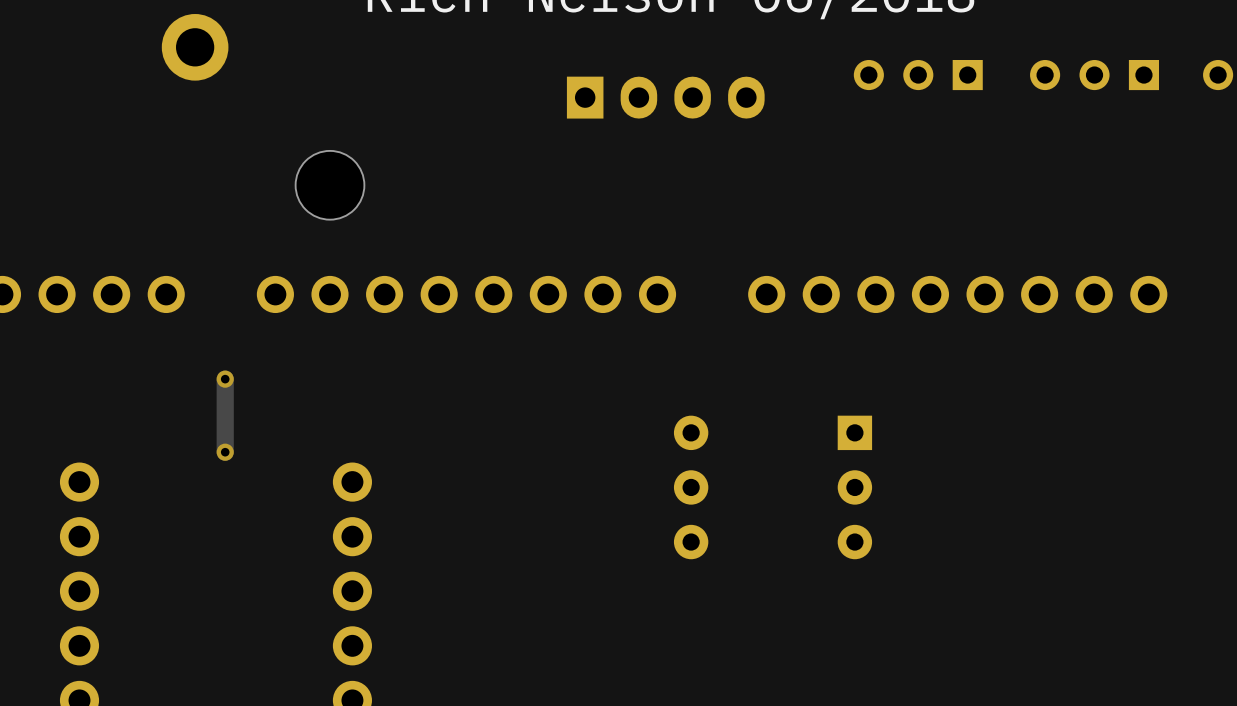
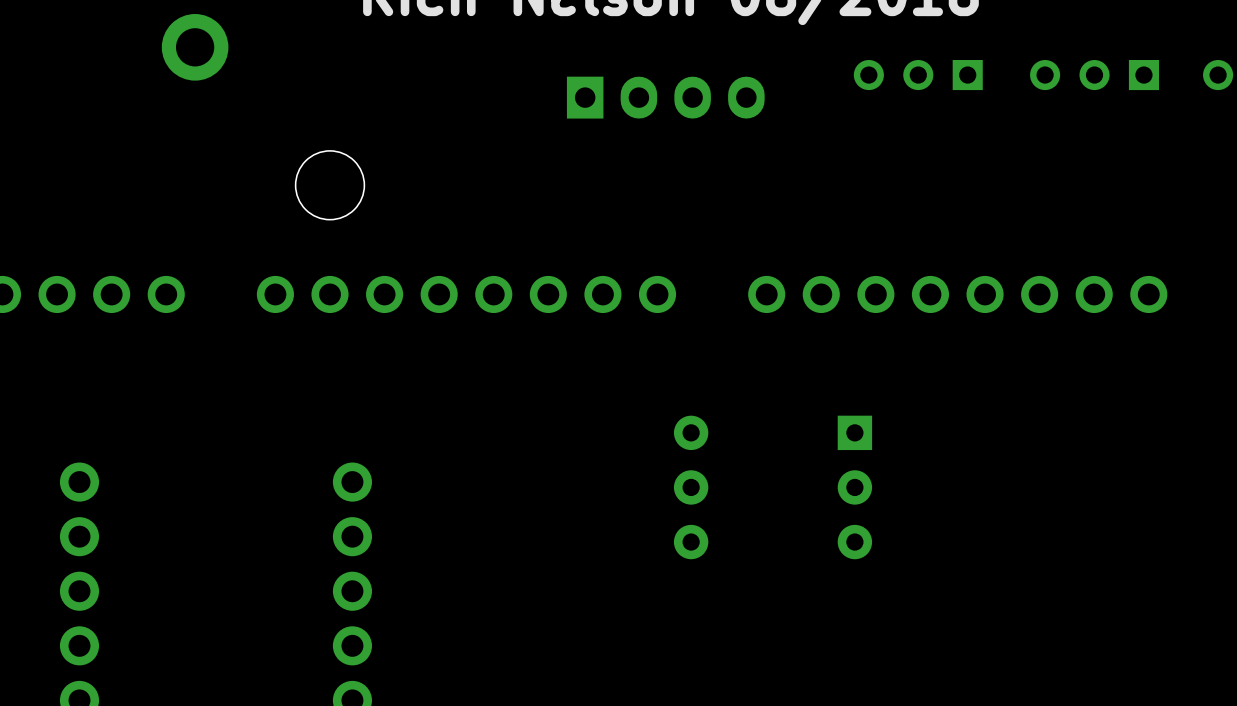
track: (225, 379) (225, 452) -> none
via: (225, 379) -> none
via: (225, 452) -> none

